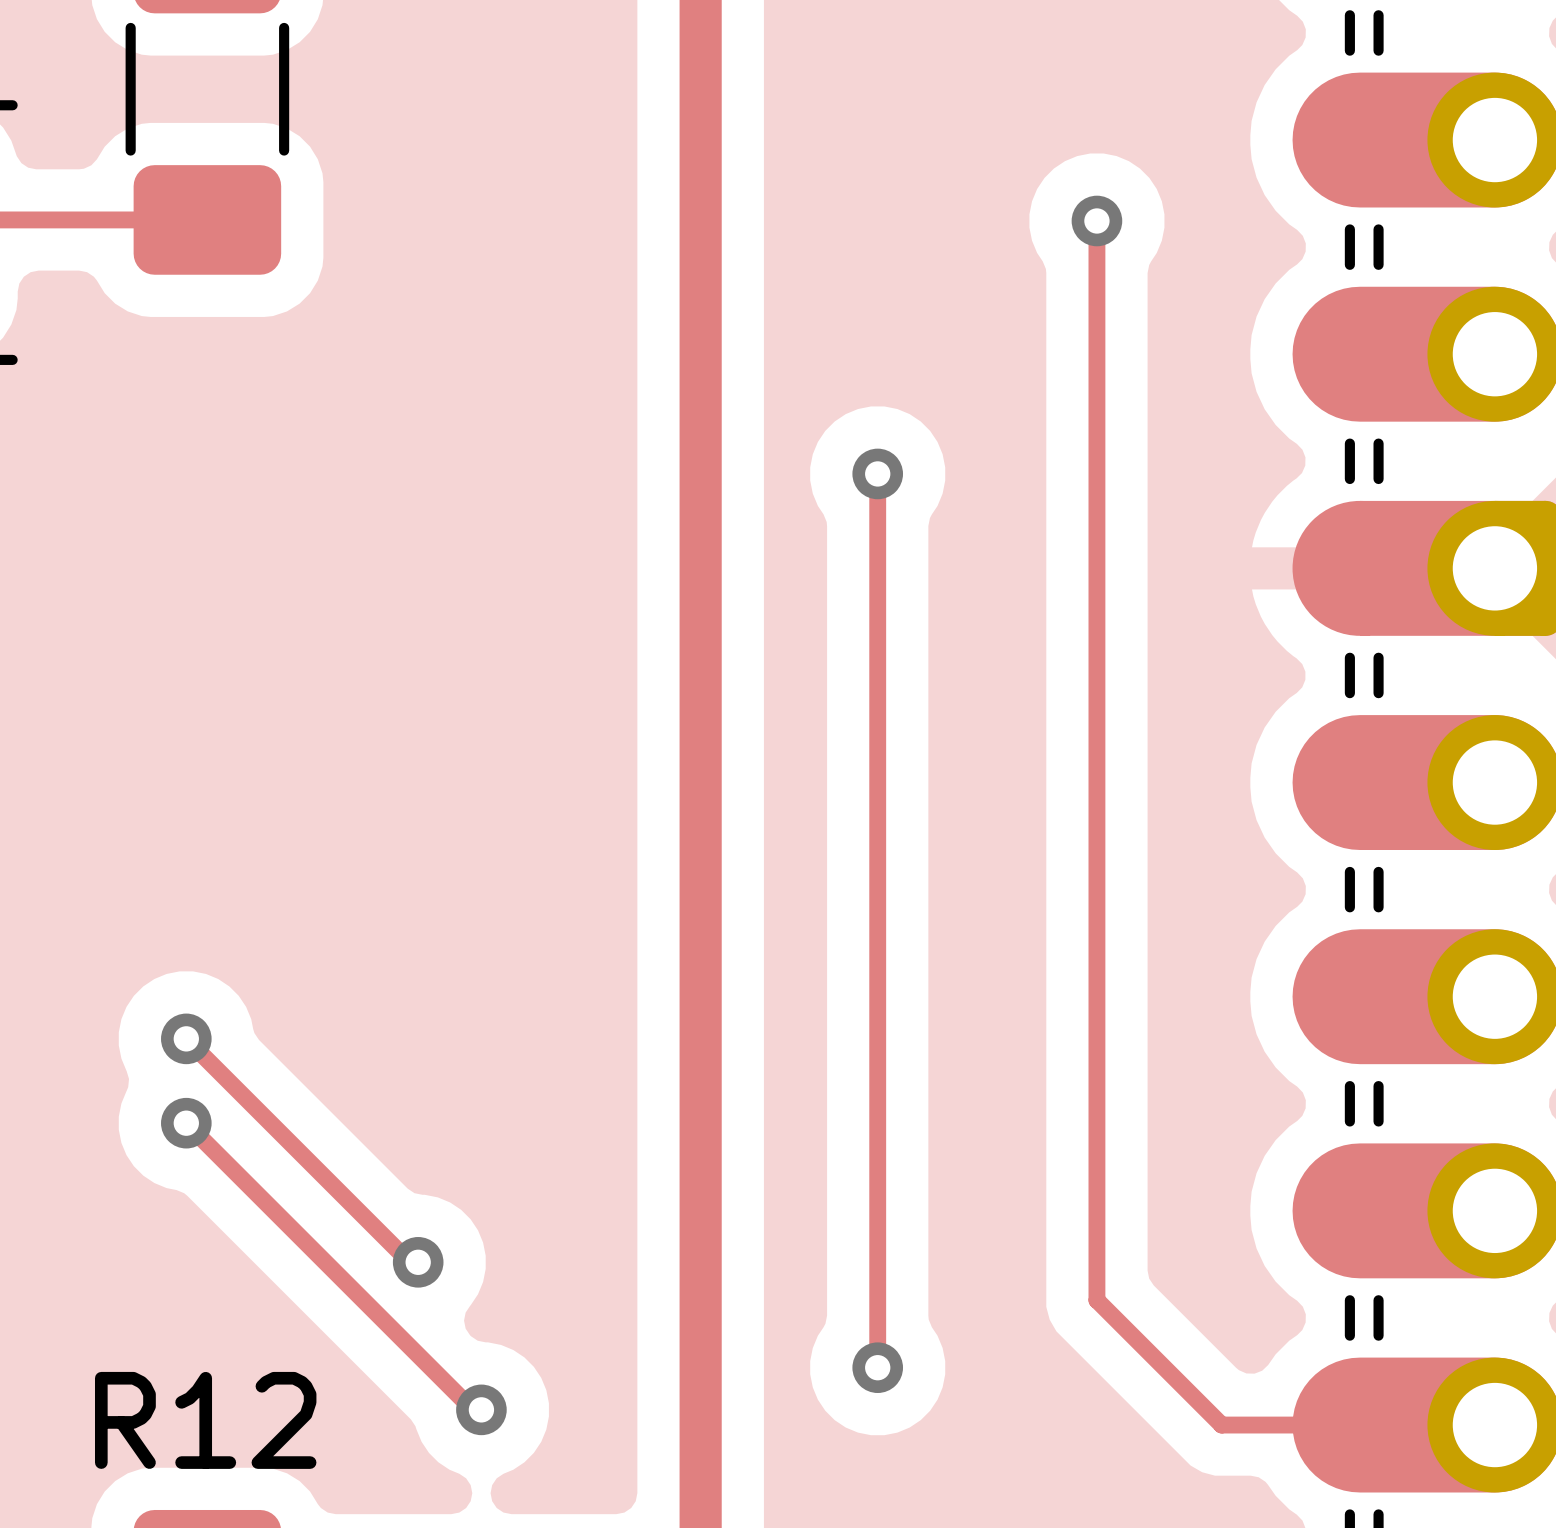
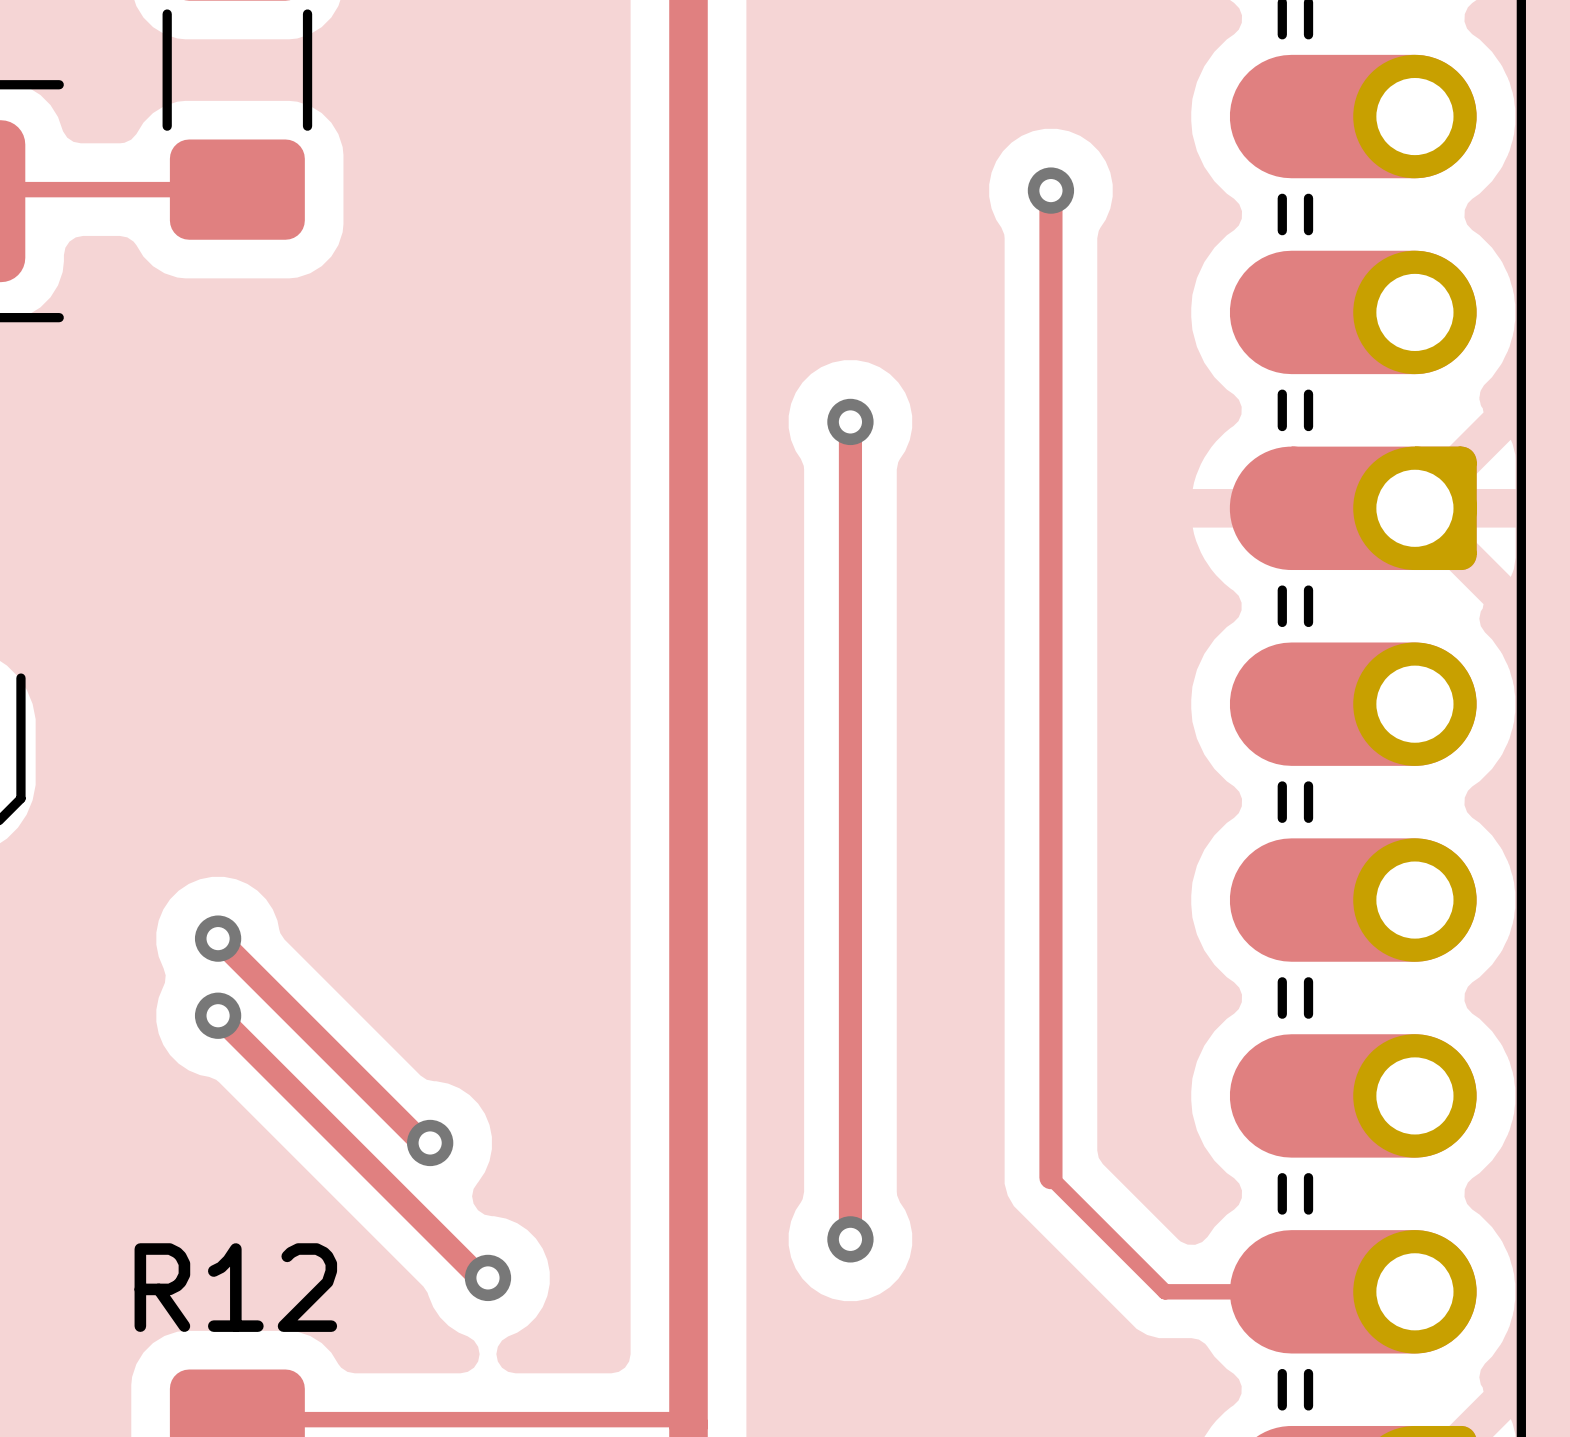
track width: thin (1096, 220) (1096, 1300) -> thick (1050, 190) (1050, 1177)
track width: thin (877, 473) (877, 1367) -> thick (850, 421) (850, 1239)
track width: thin (186, 1038) (409, 1262) -> thick (218, 938) (422, 1142)
track width: thin (186, 1123) (472, 1409) -> thick (218, 1015) (480, 1277)

